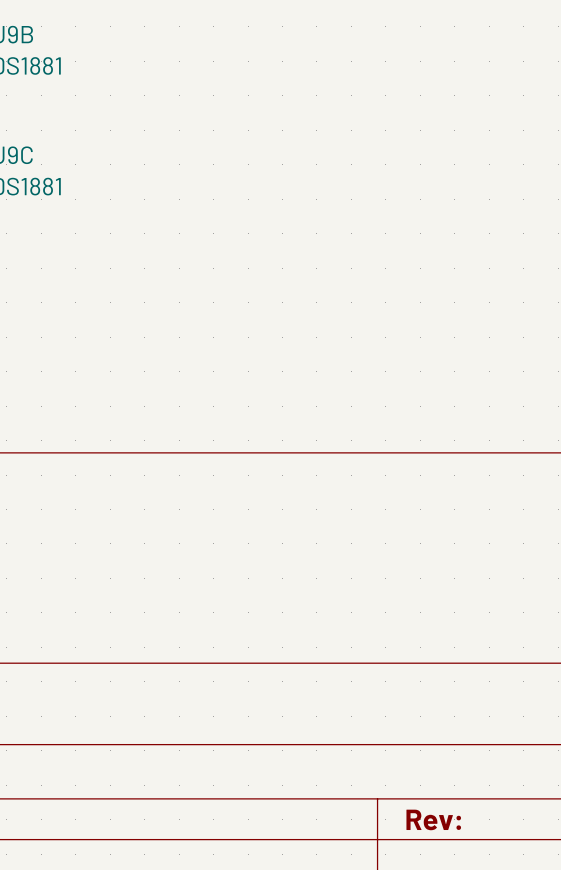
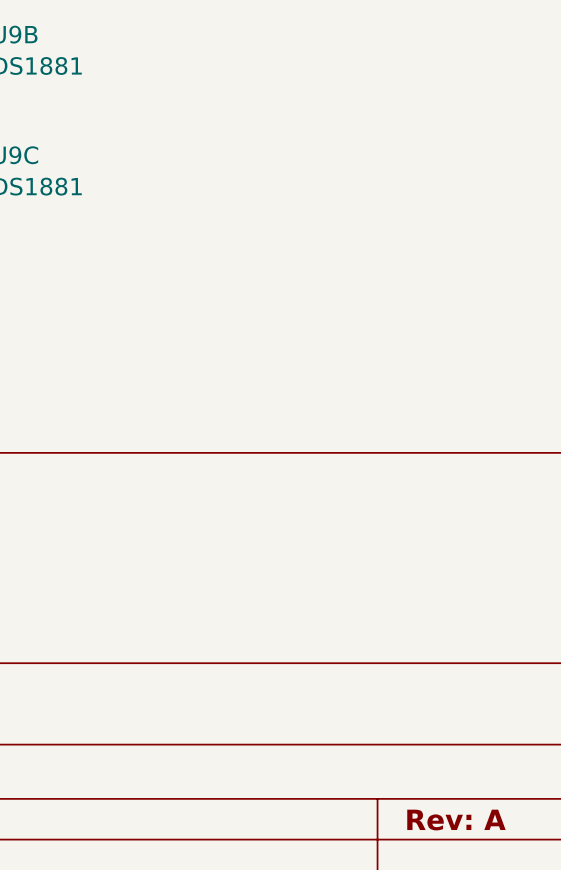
title block: Rev: (433, 819) -> Rev: A (456, 820)

